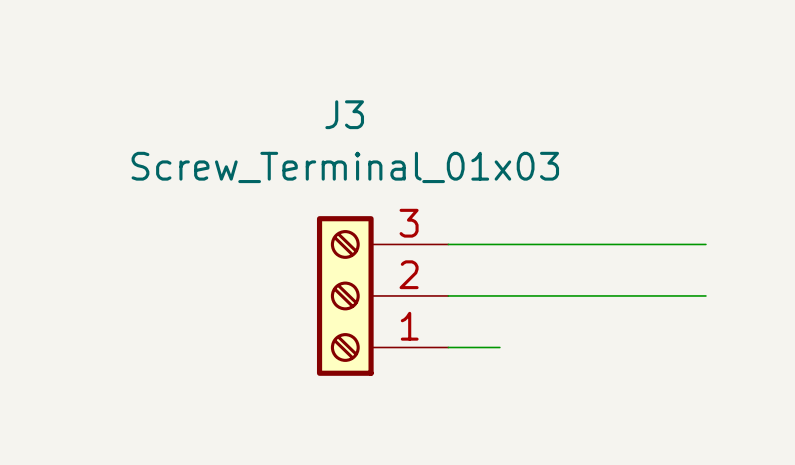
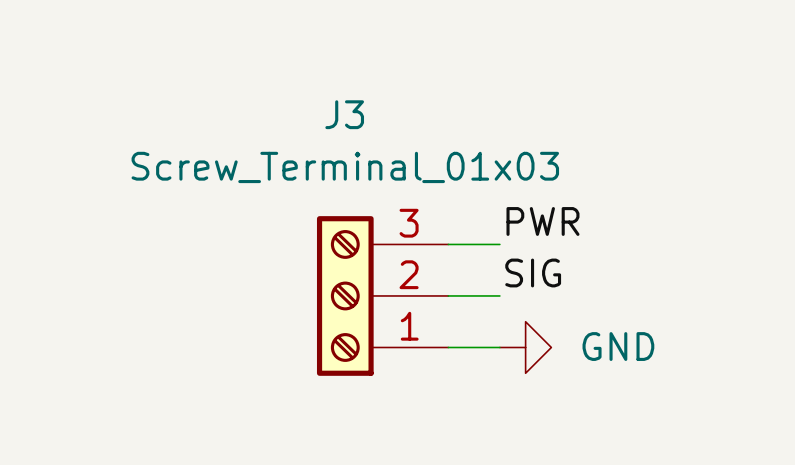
label: none -> PWR (542, 221)
wire: (499, 244) (705, 244) -> none
label: none -> SIG (533, 272)
wire: (499, 295) (705, 295) -> none
power symbol: none -> GND (525, 347)

